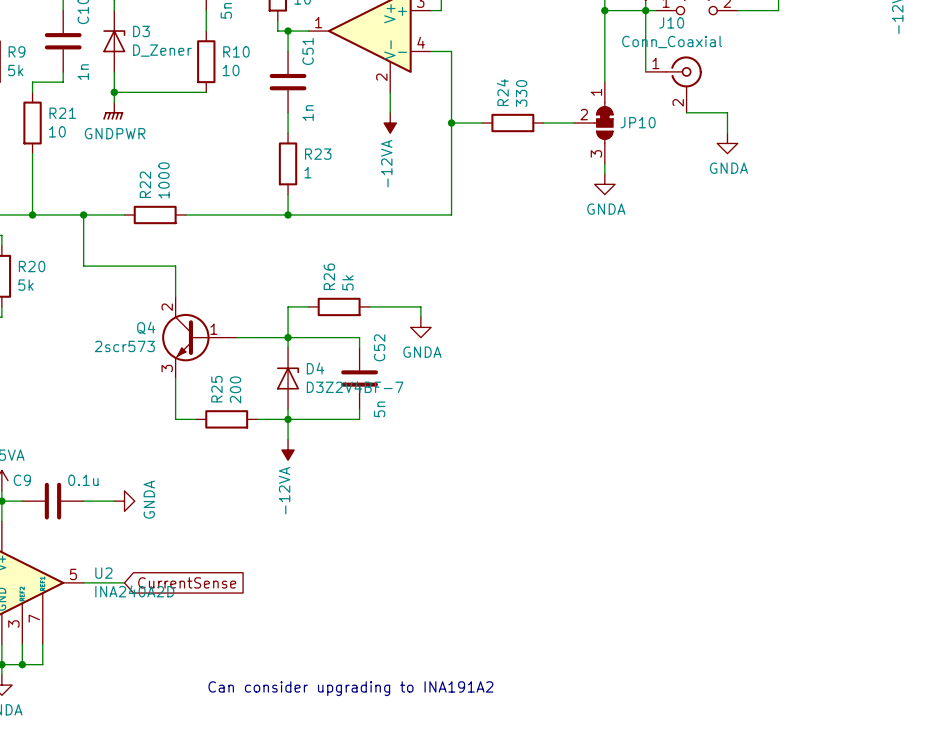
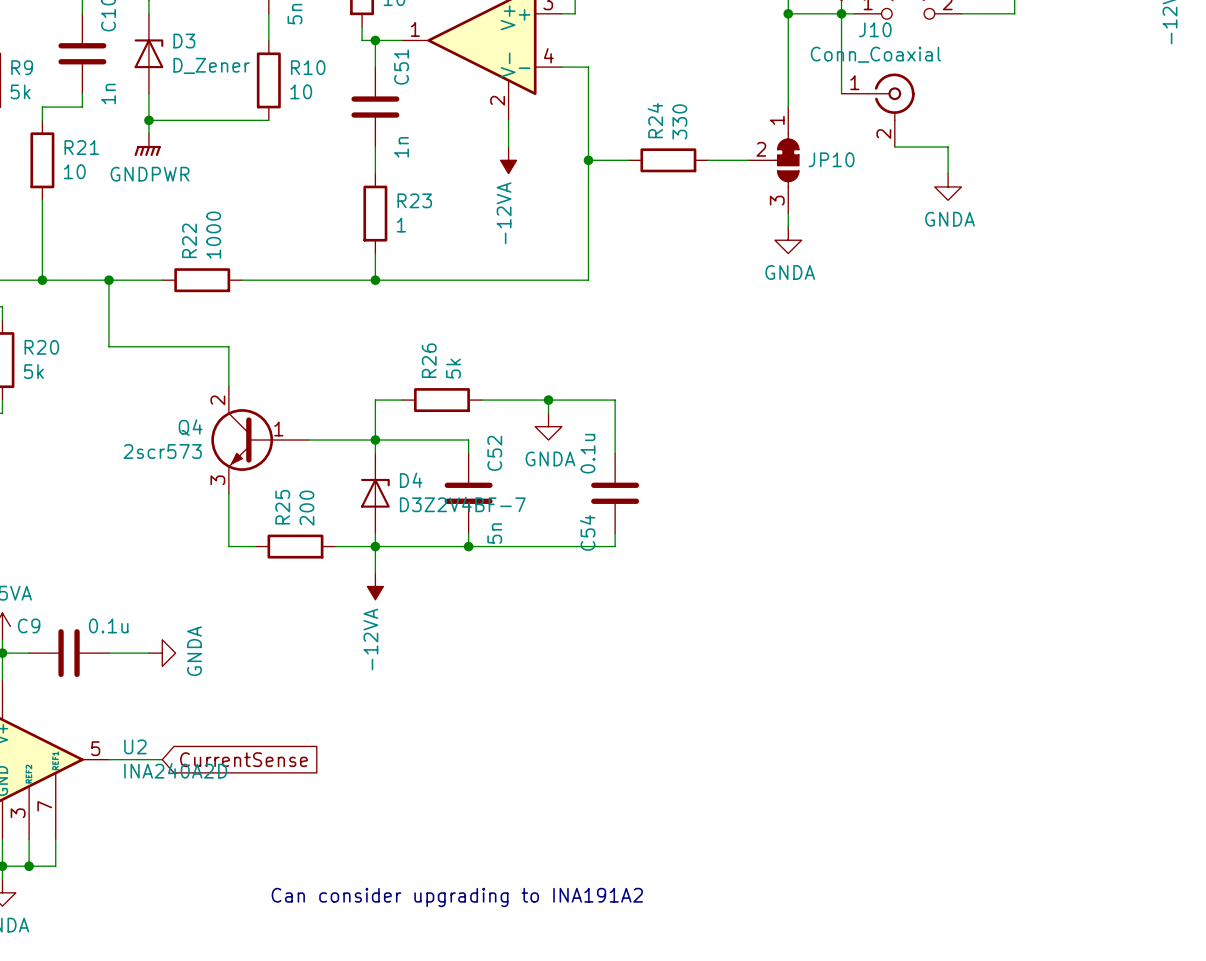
wire: none -> (548, 400) (615, 400) (615, 453)
junction: none -> (548, 400)
C54: none -> 0.1u (615, 493)
wire: none -> (615, 533) (615, 546) (468, 546)
junction: none -> (468, 546)

